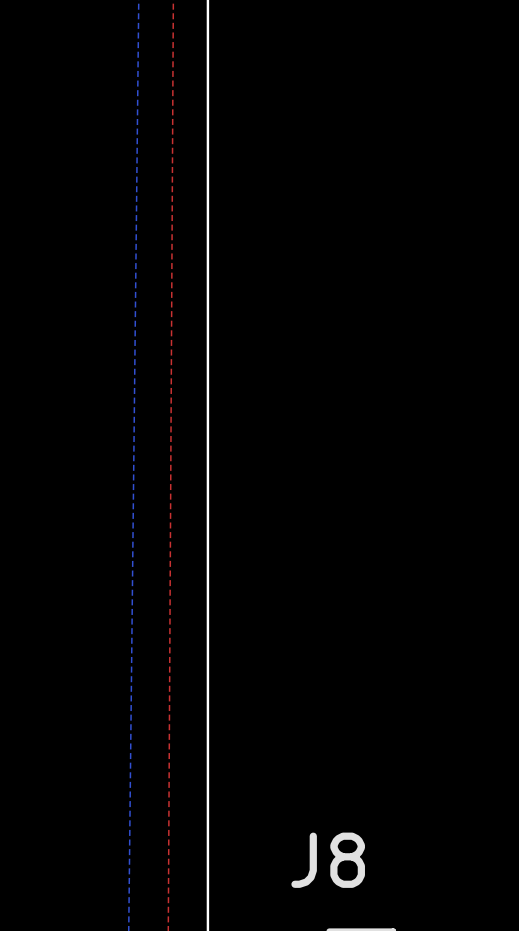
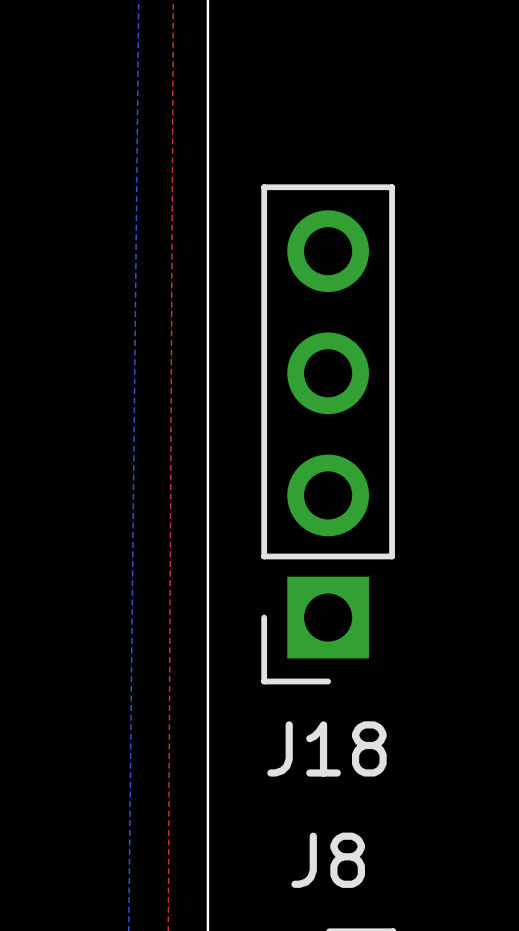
J18: none -> (328, 434)

